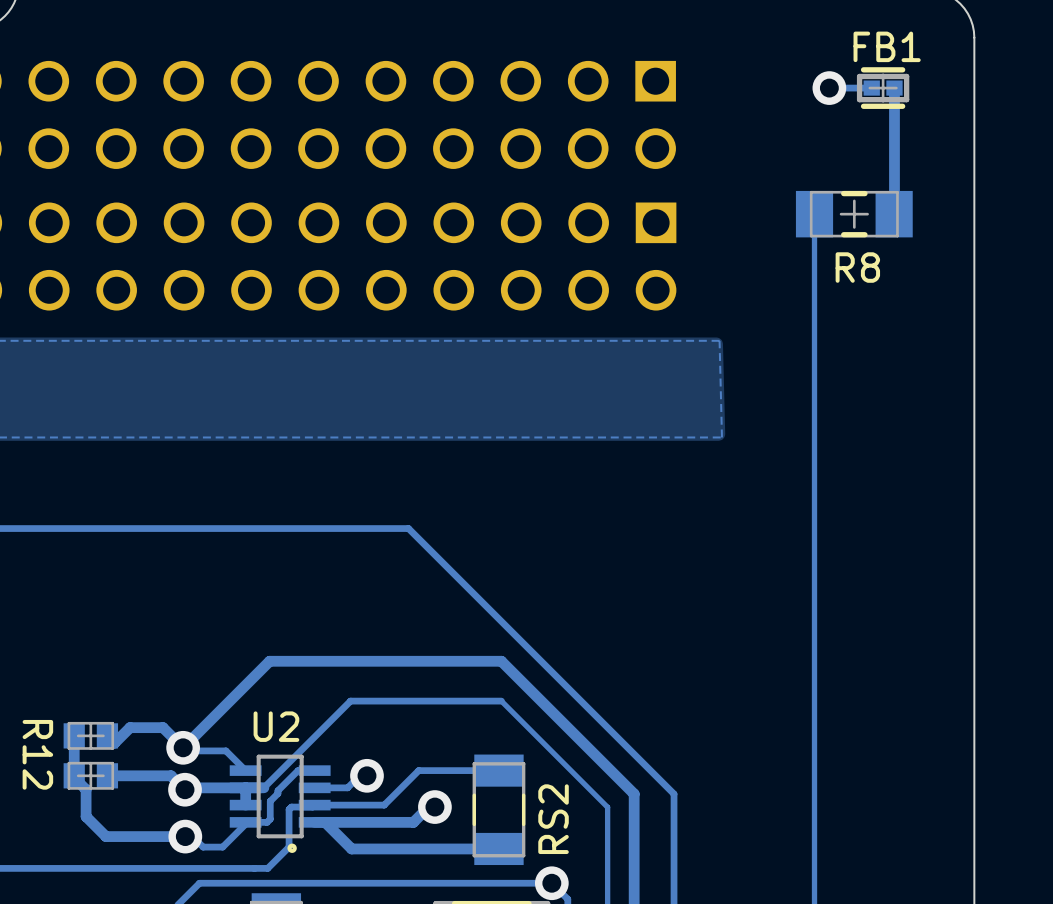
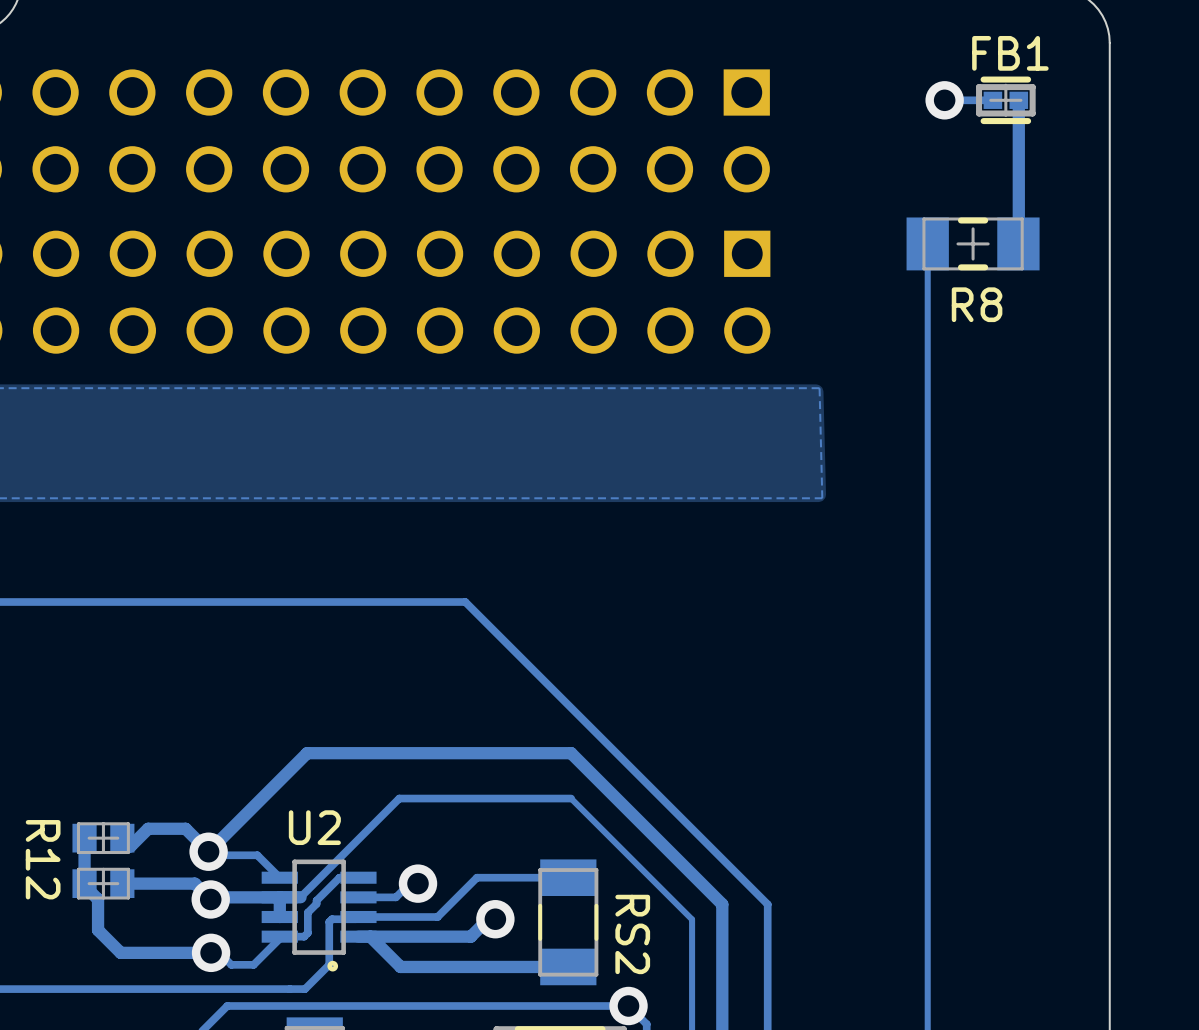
RS2 name rotation: 0° (553, 819) -> 180° (632, 934)

